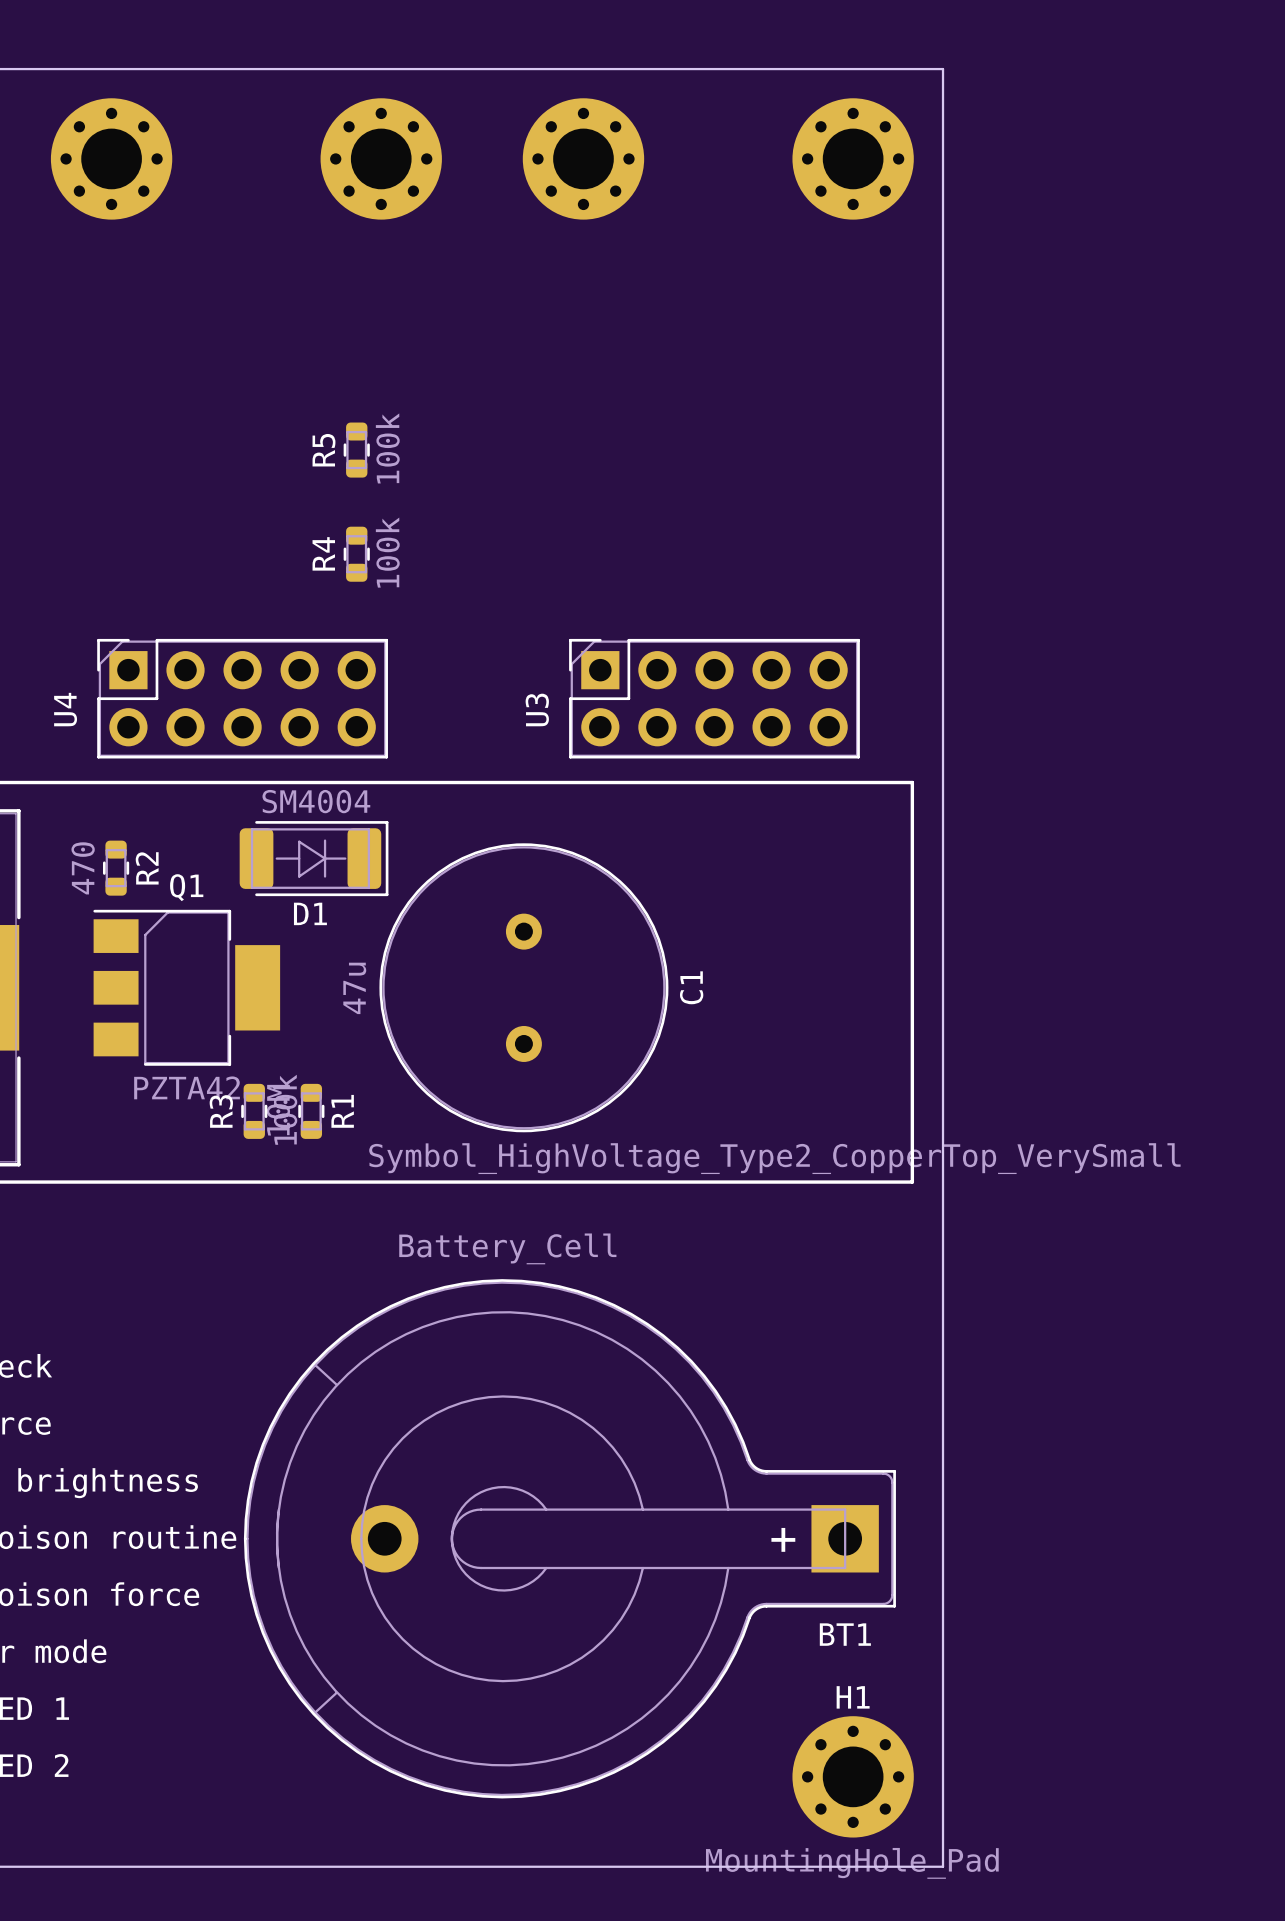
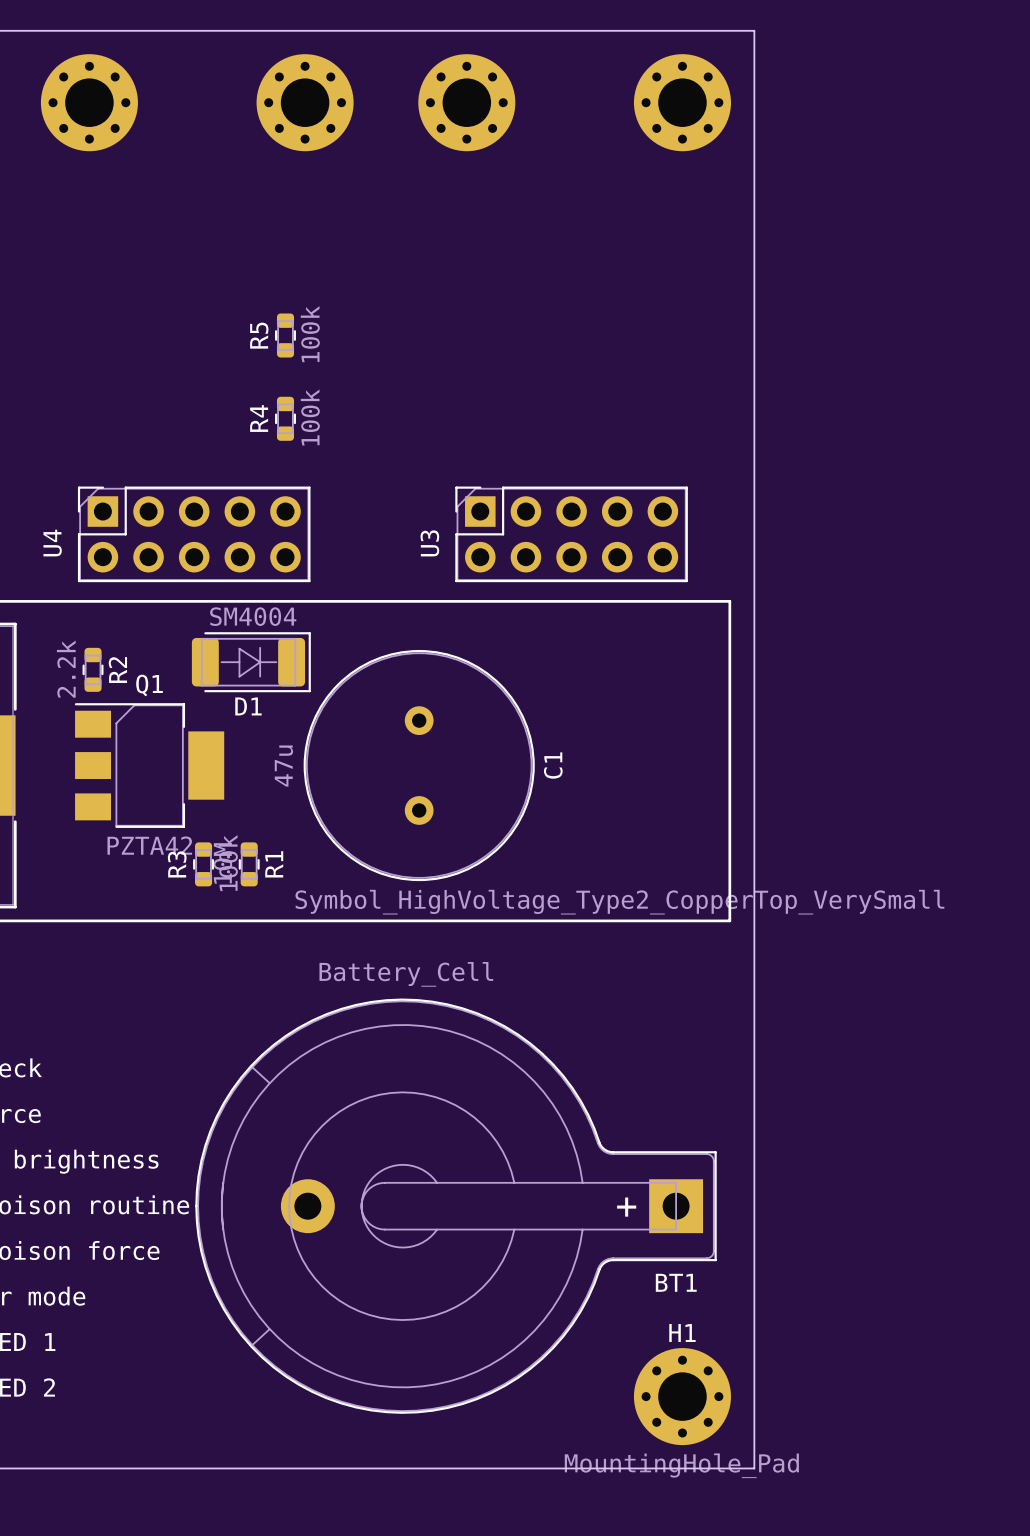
R2 value: 470 (83, 868) -> 2.2k (66, 669)

